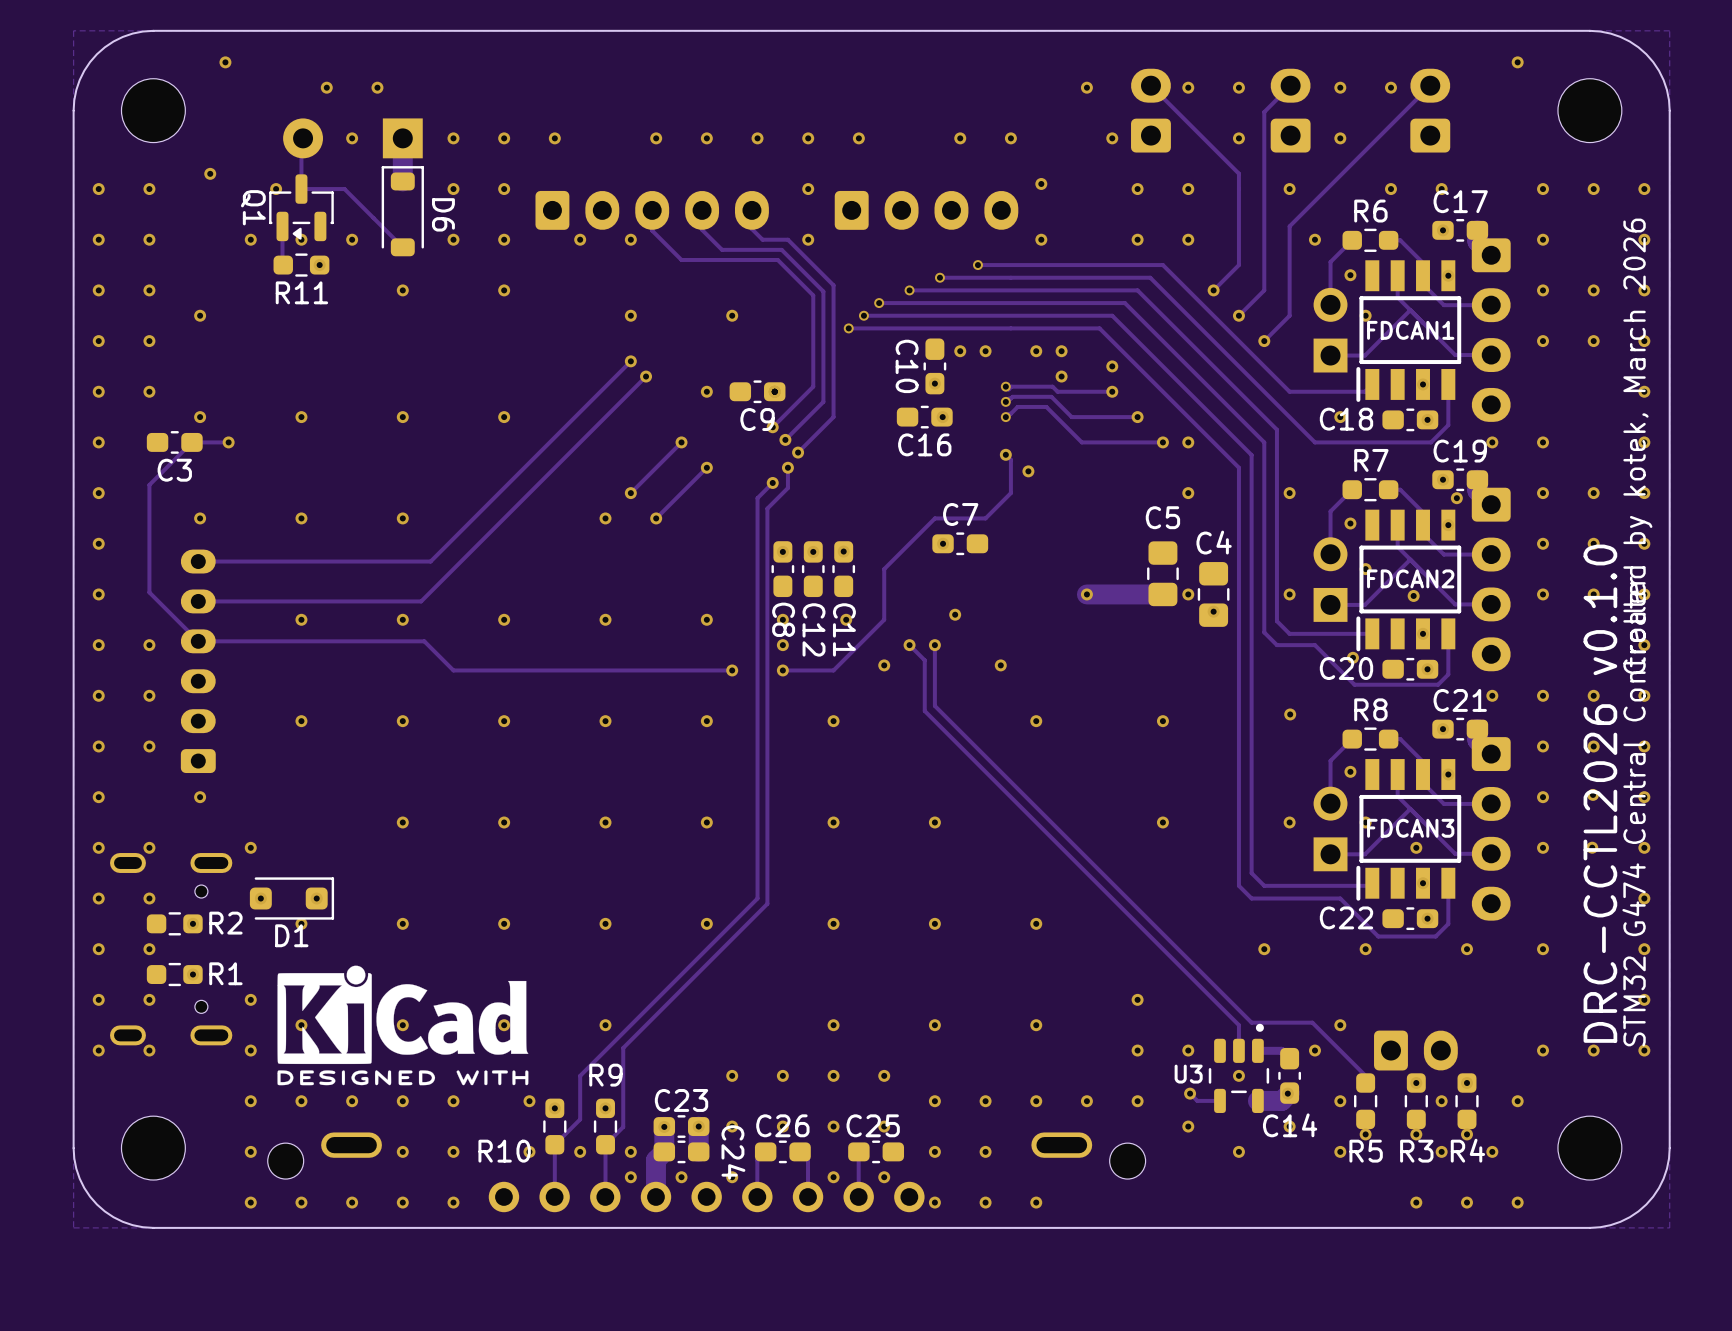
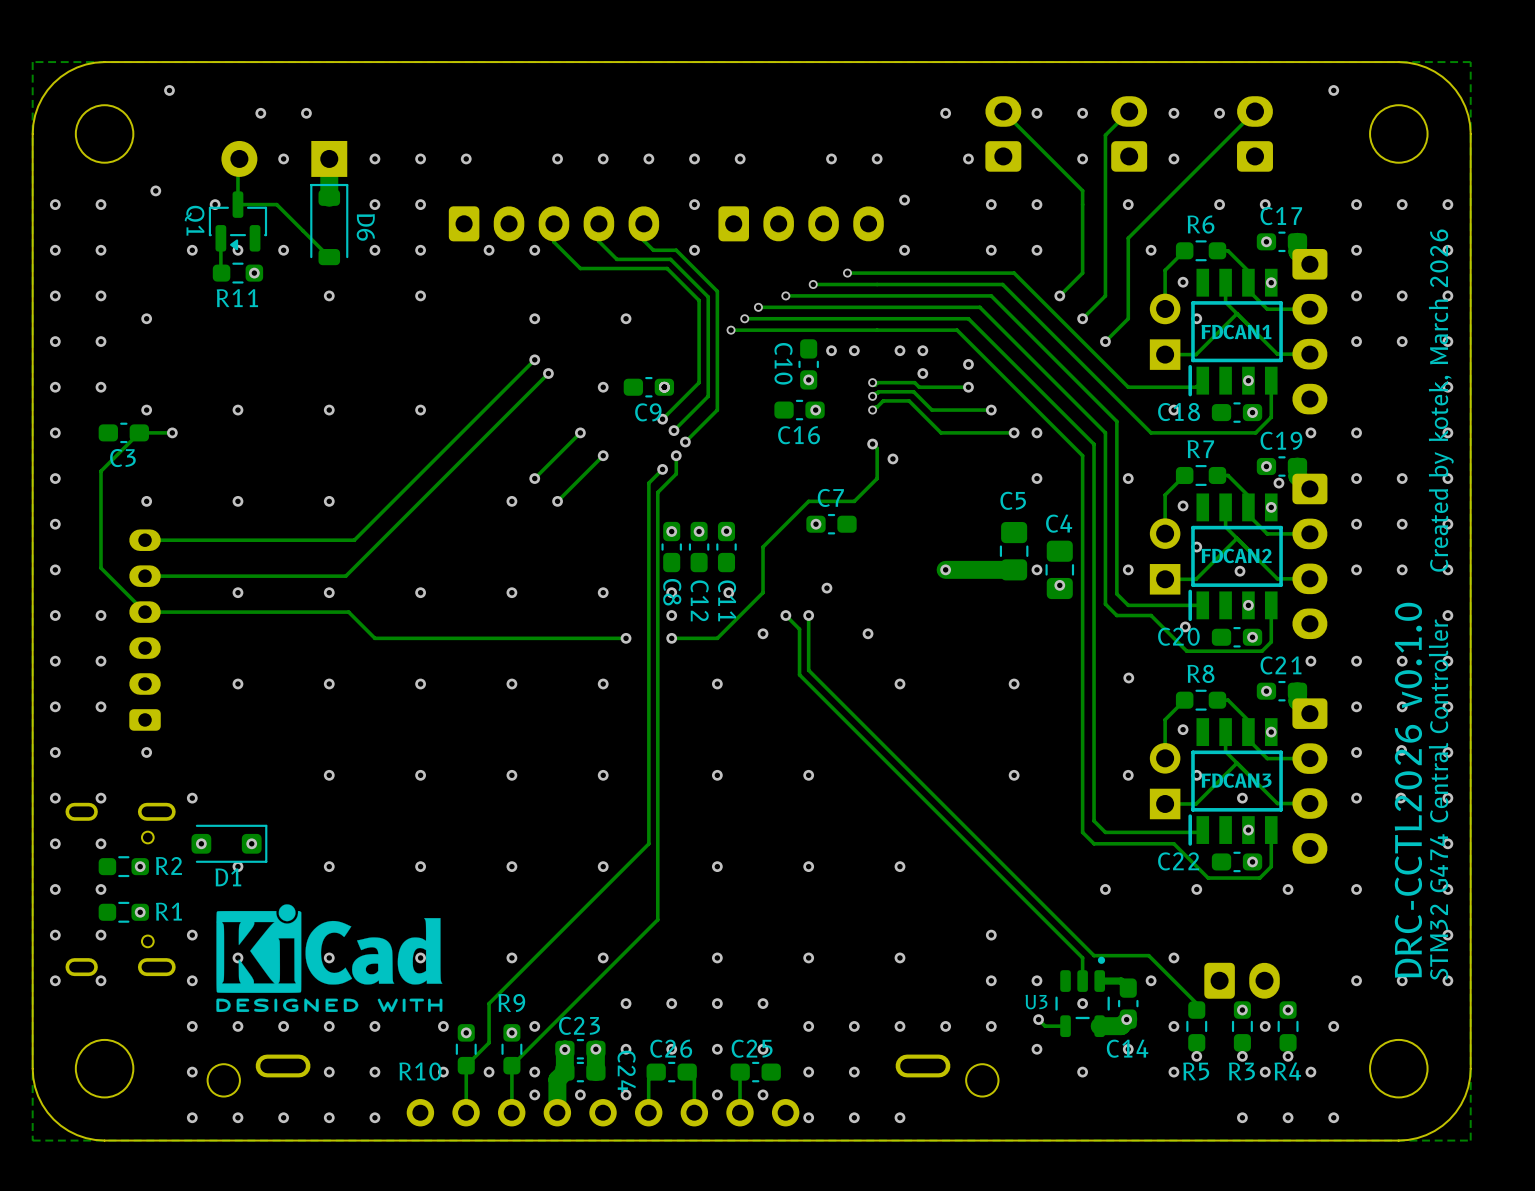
track: (767, 903) (623, 1048) (623, 1127) -> (657, 848) (657, 919) (527, 1049)
via: none -> (603, 957)
via: none -> (534, 1026)

